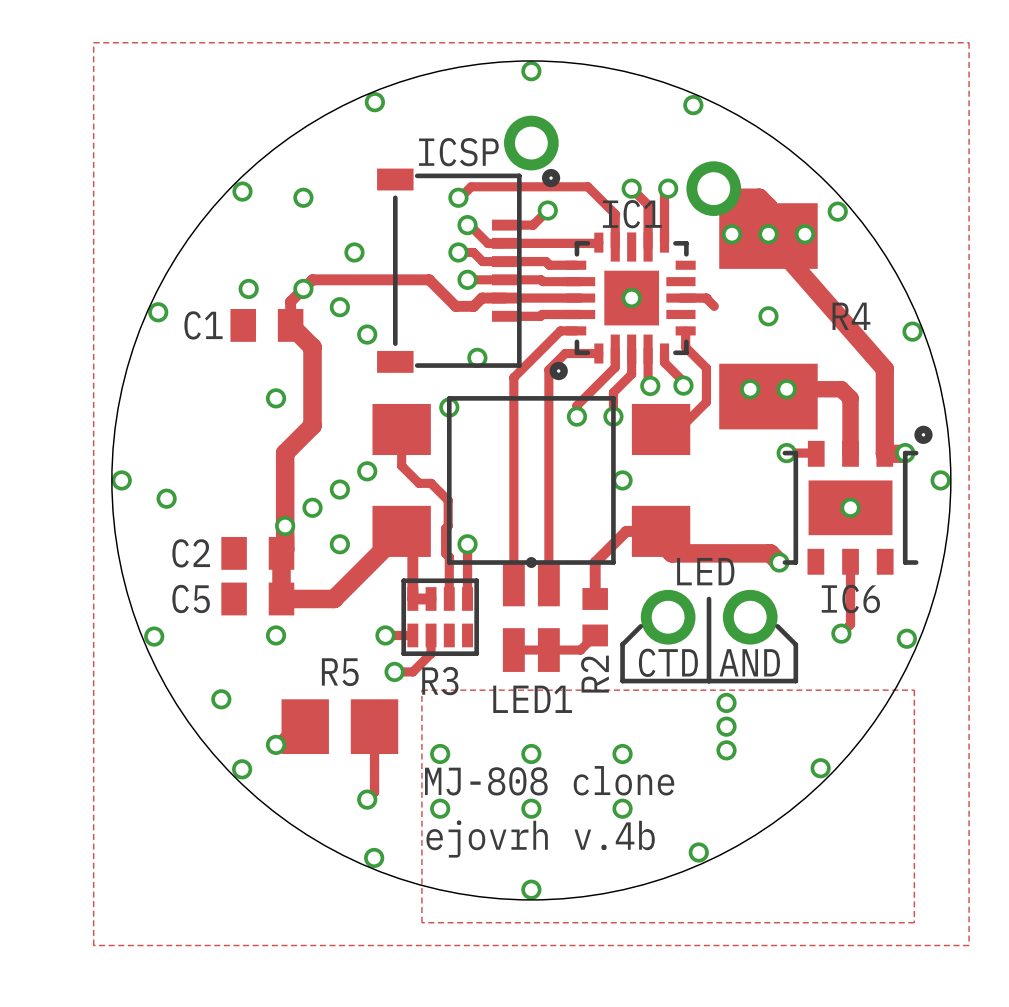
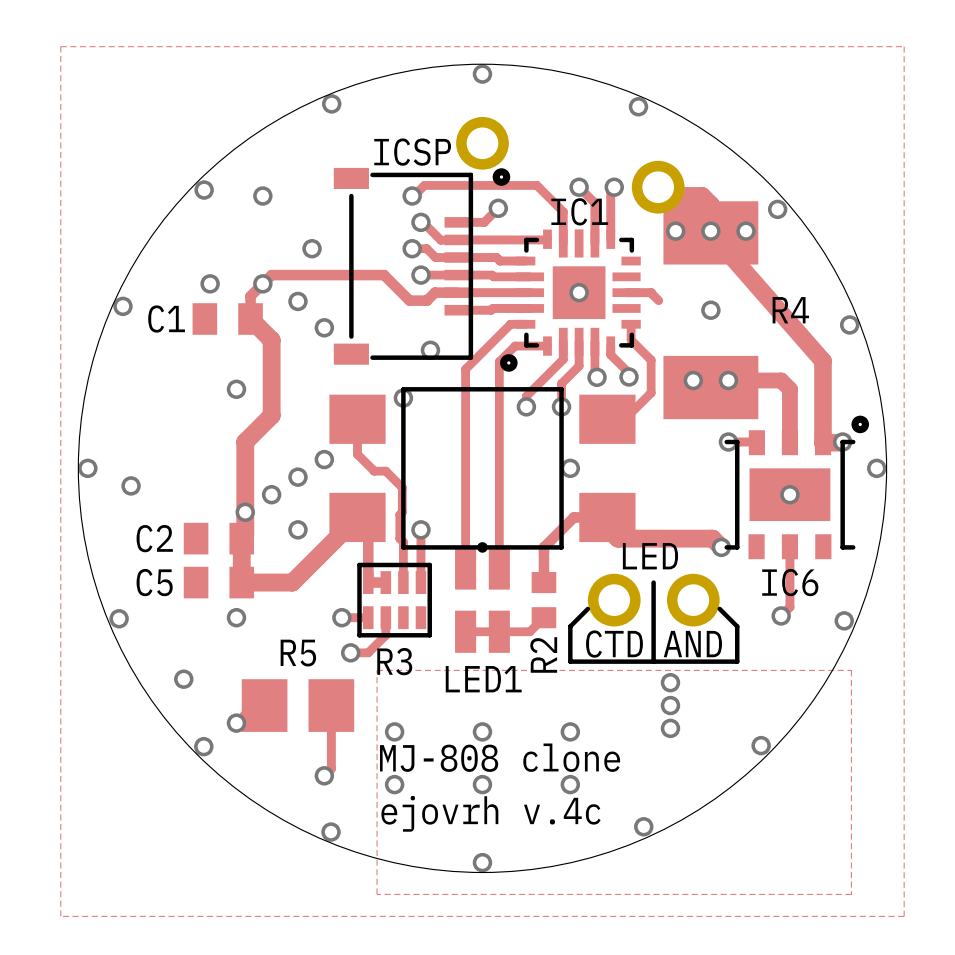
text: ejovrh v.4b (540, 839) -> ejovrh v.4c (490, 813)

